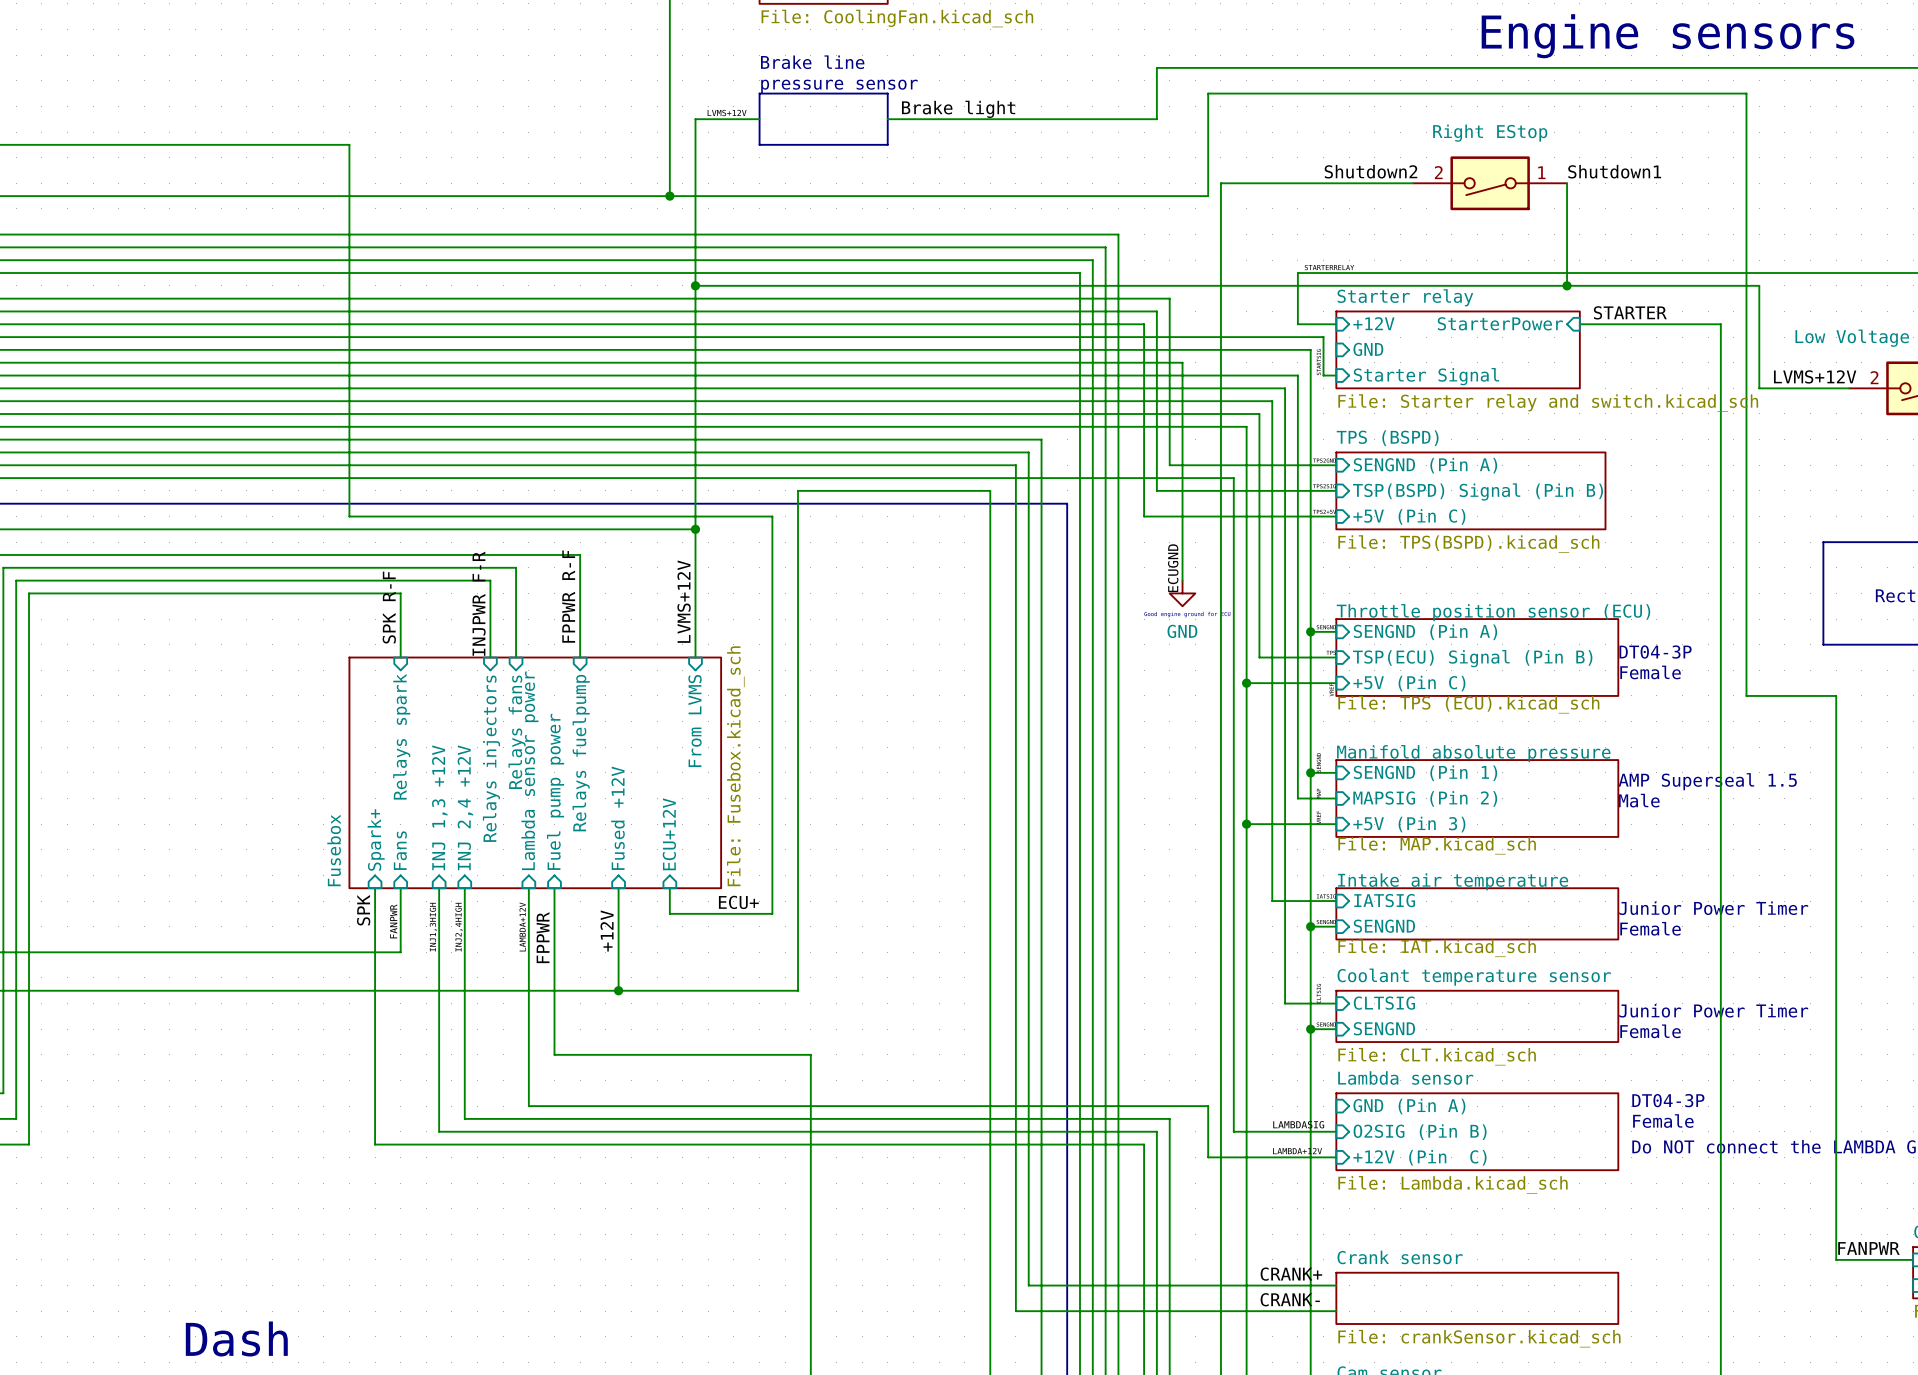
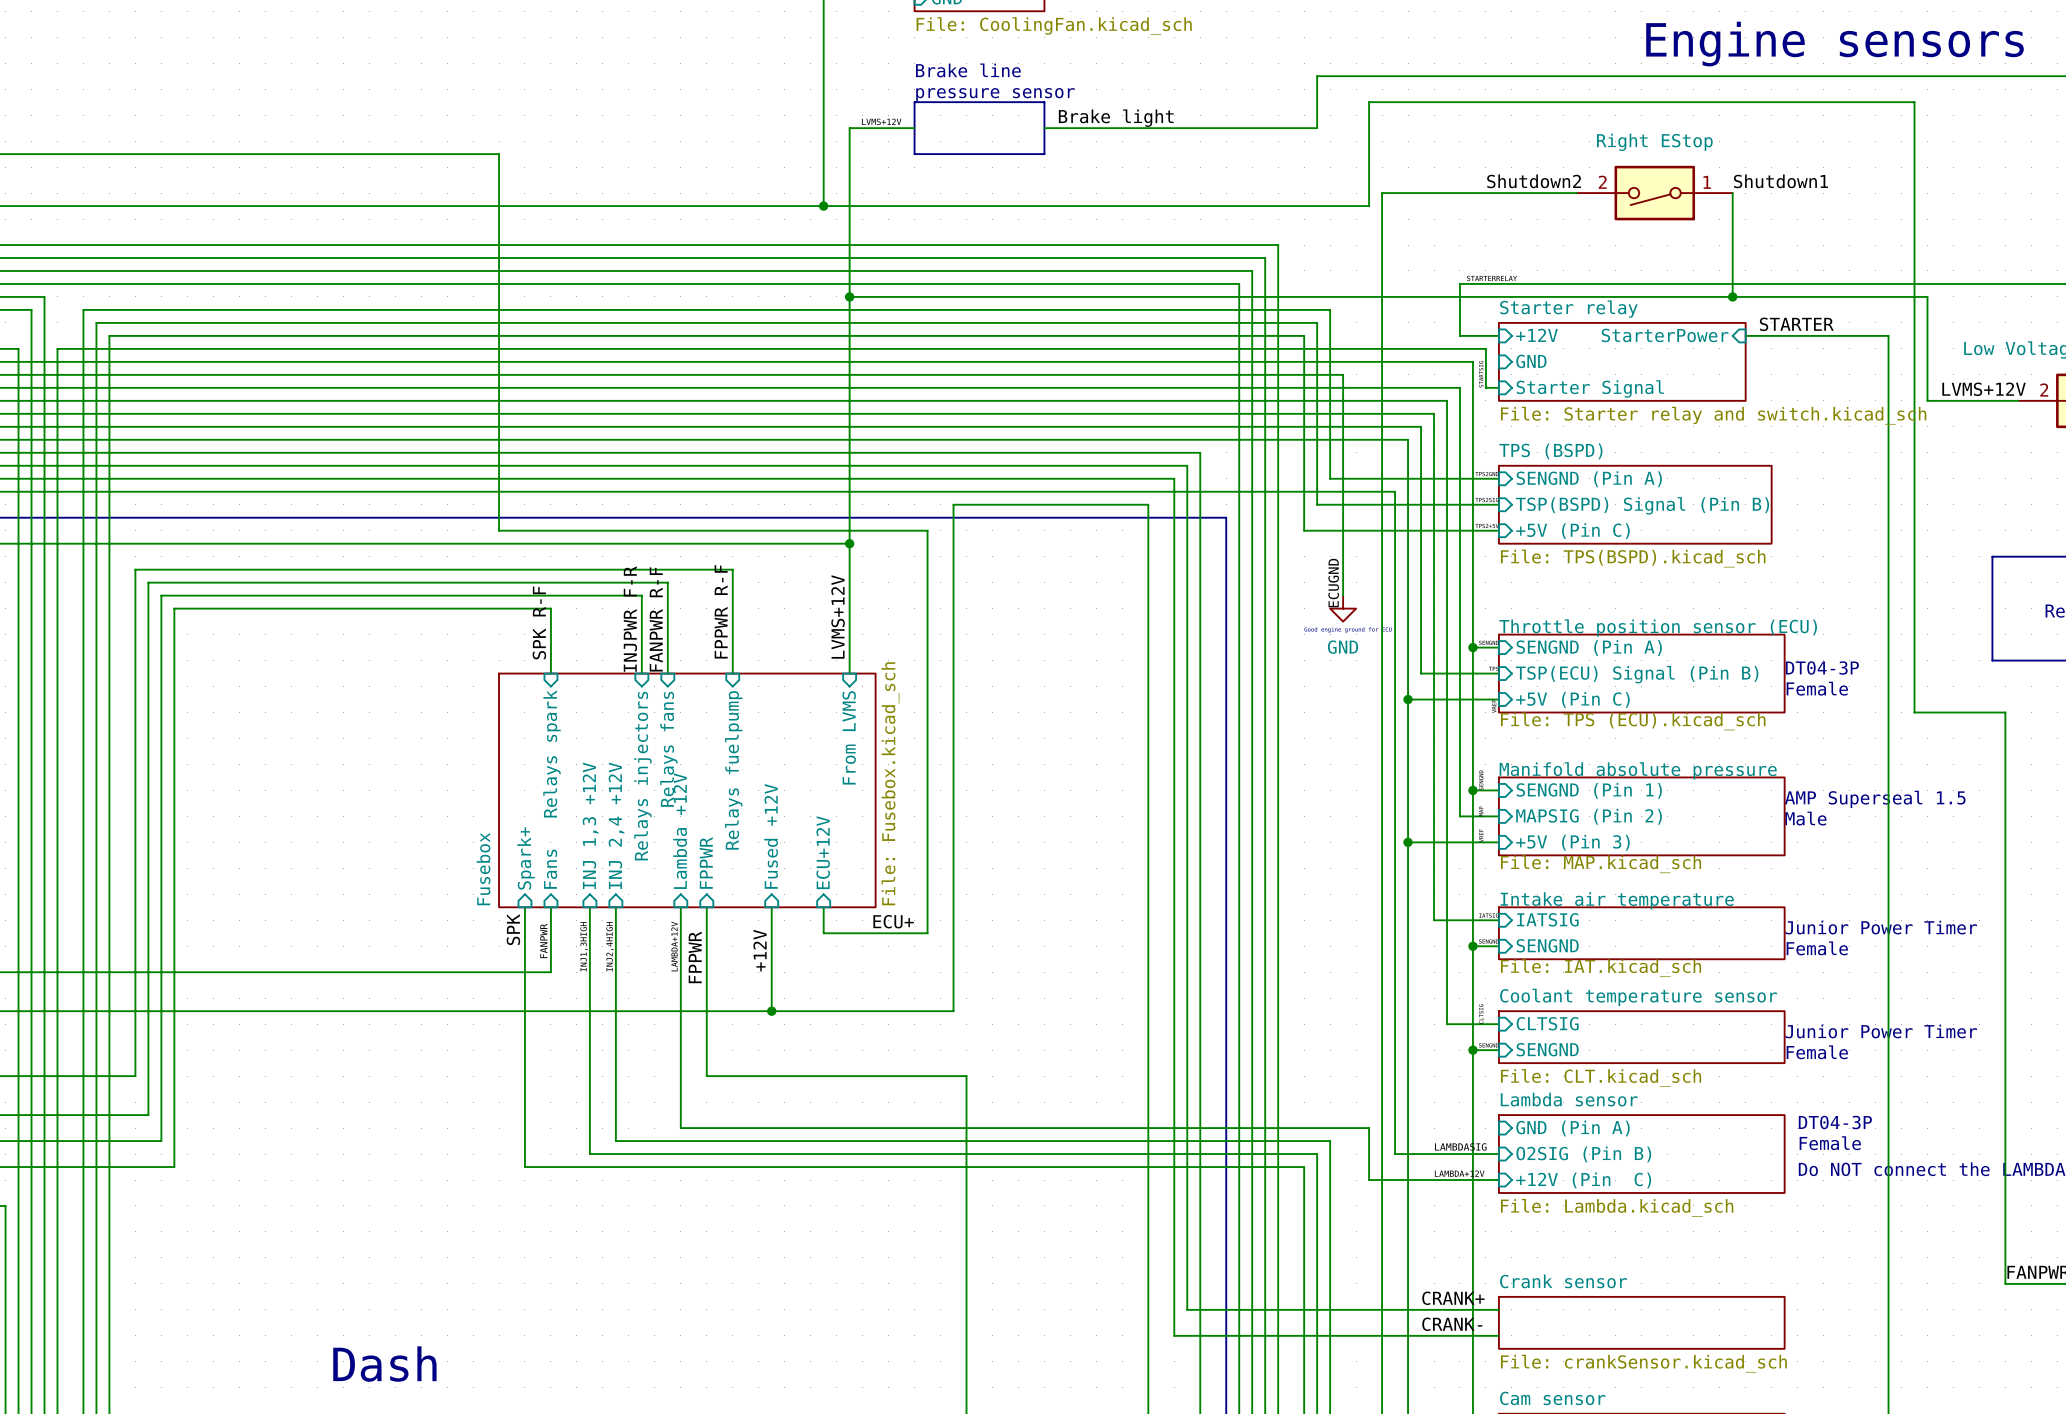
label: none -> FANPWR R-F (656, 619)
sheet pin: Lambda sensor power (529, 770) -> Lambda +12V (680, 831)
sheet pin: Fuel pump power (555, 791) -> FPPWR (706, 862)

